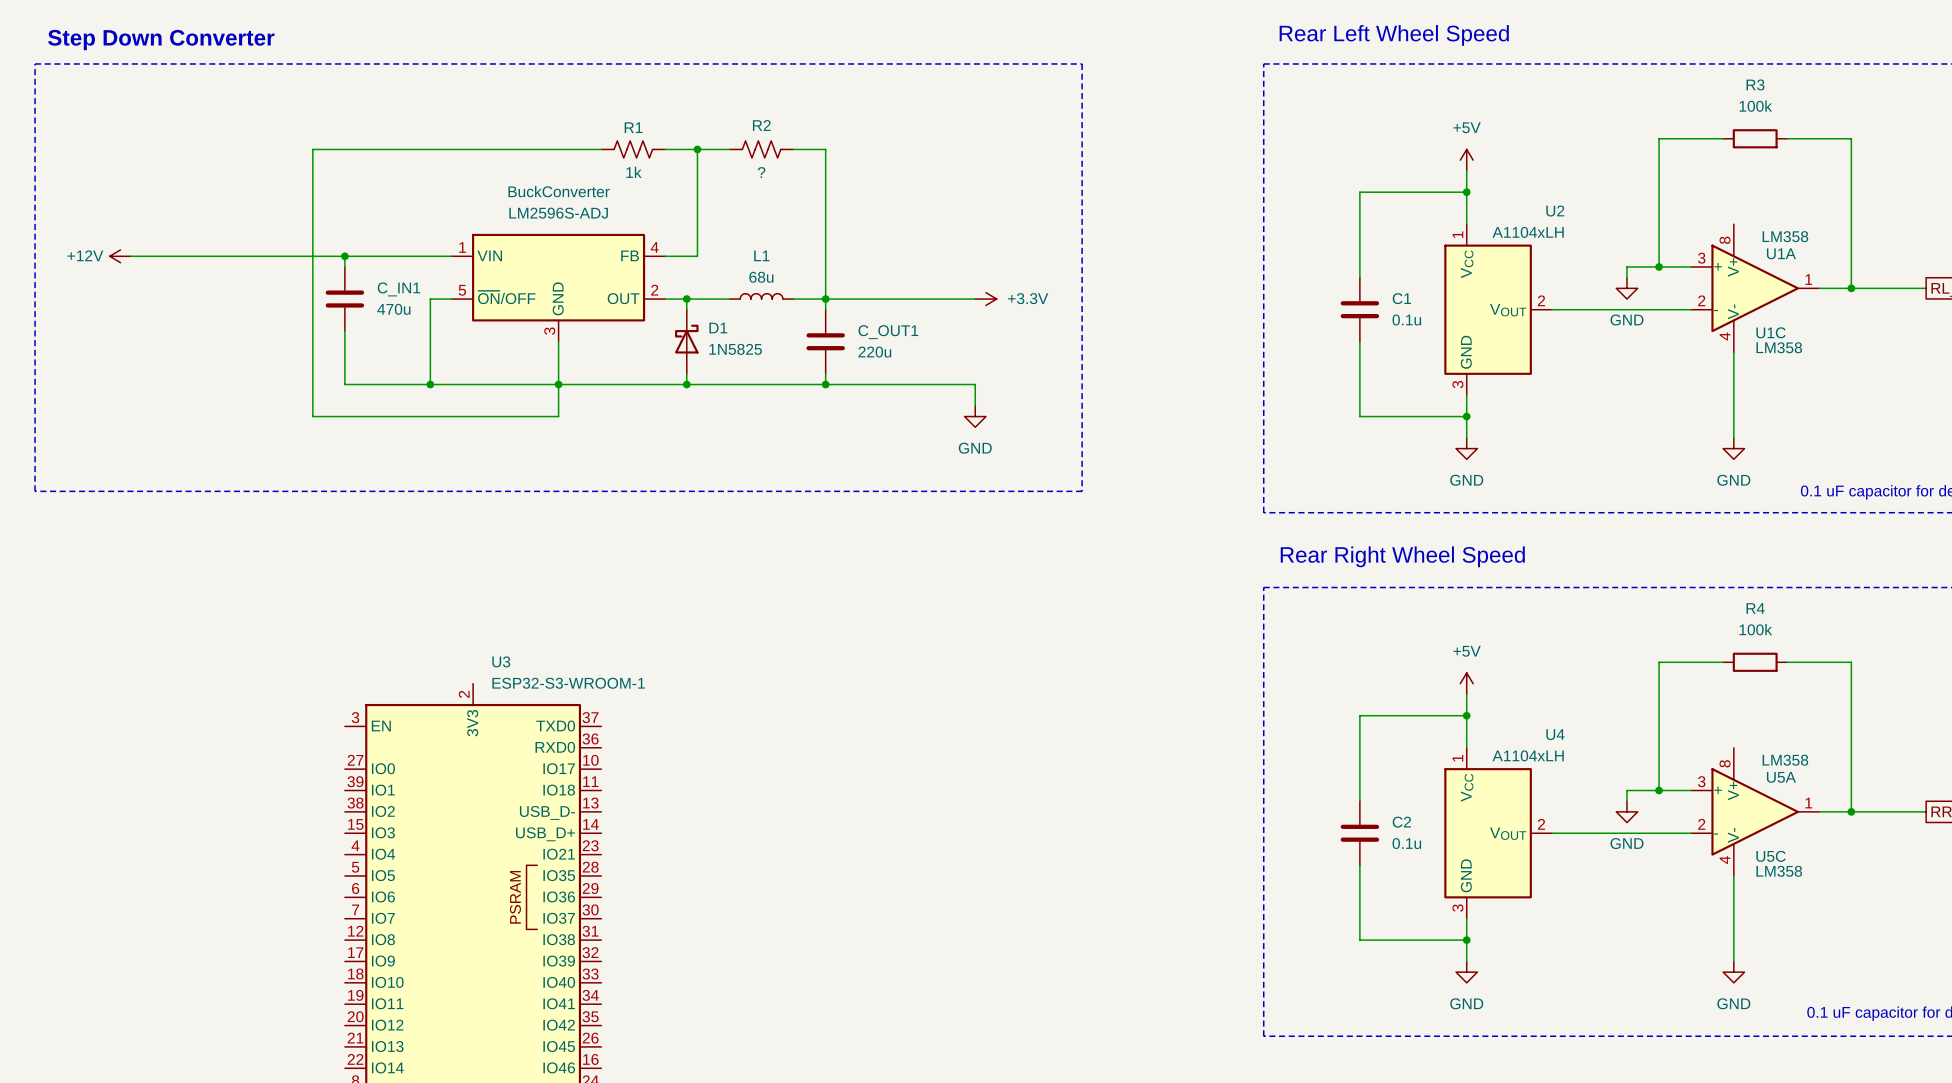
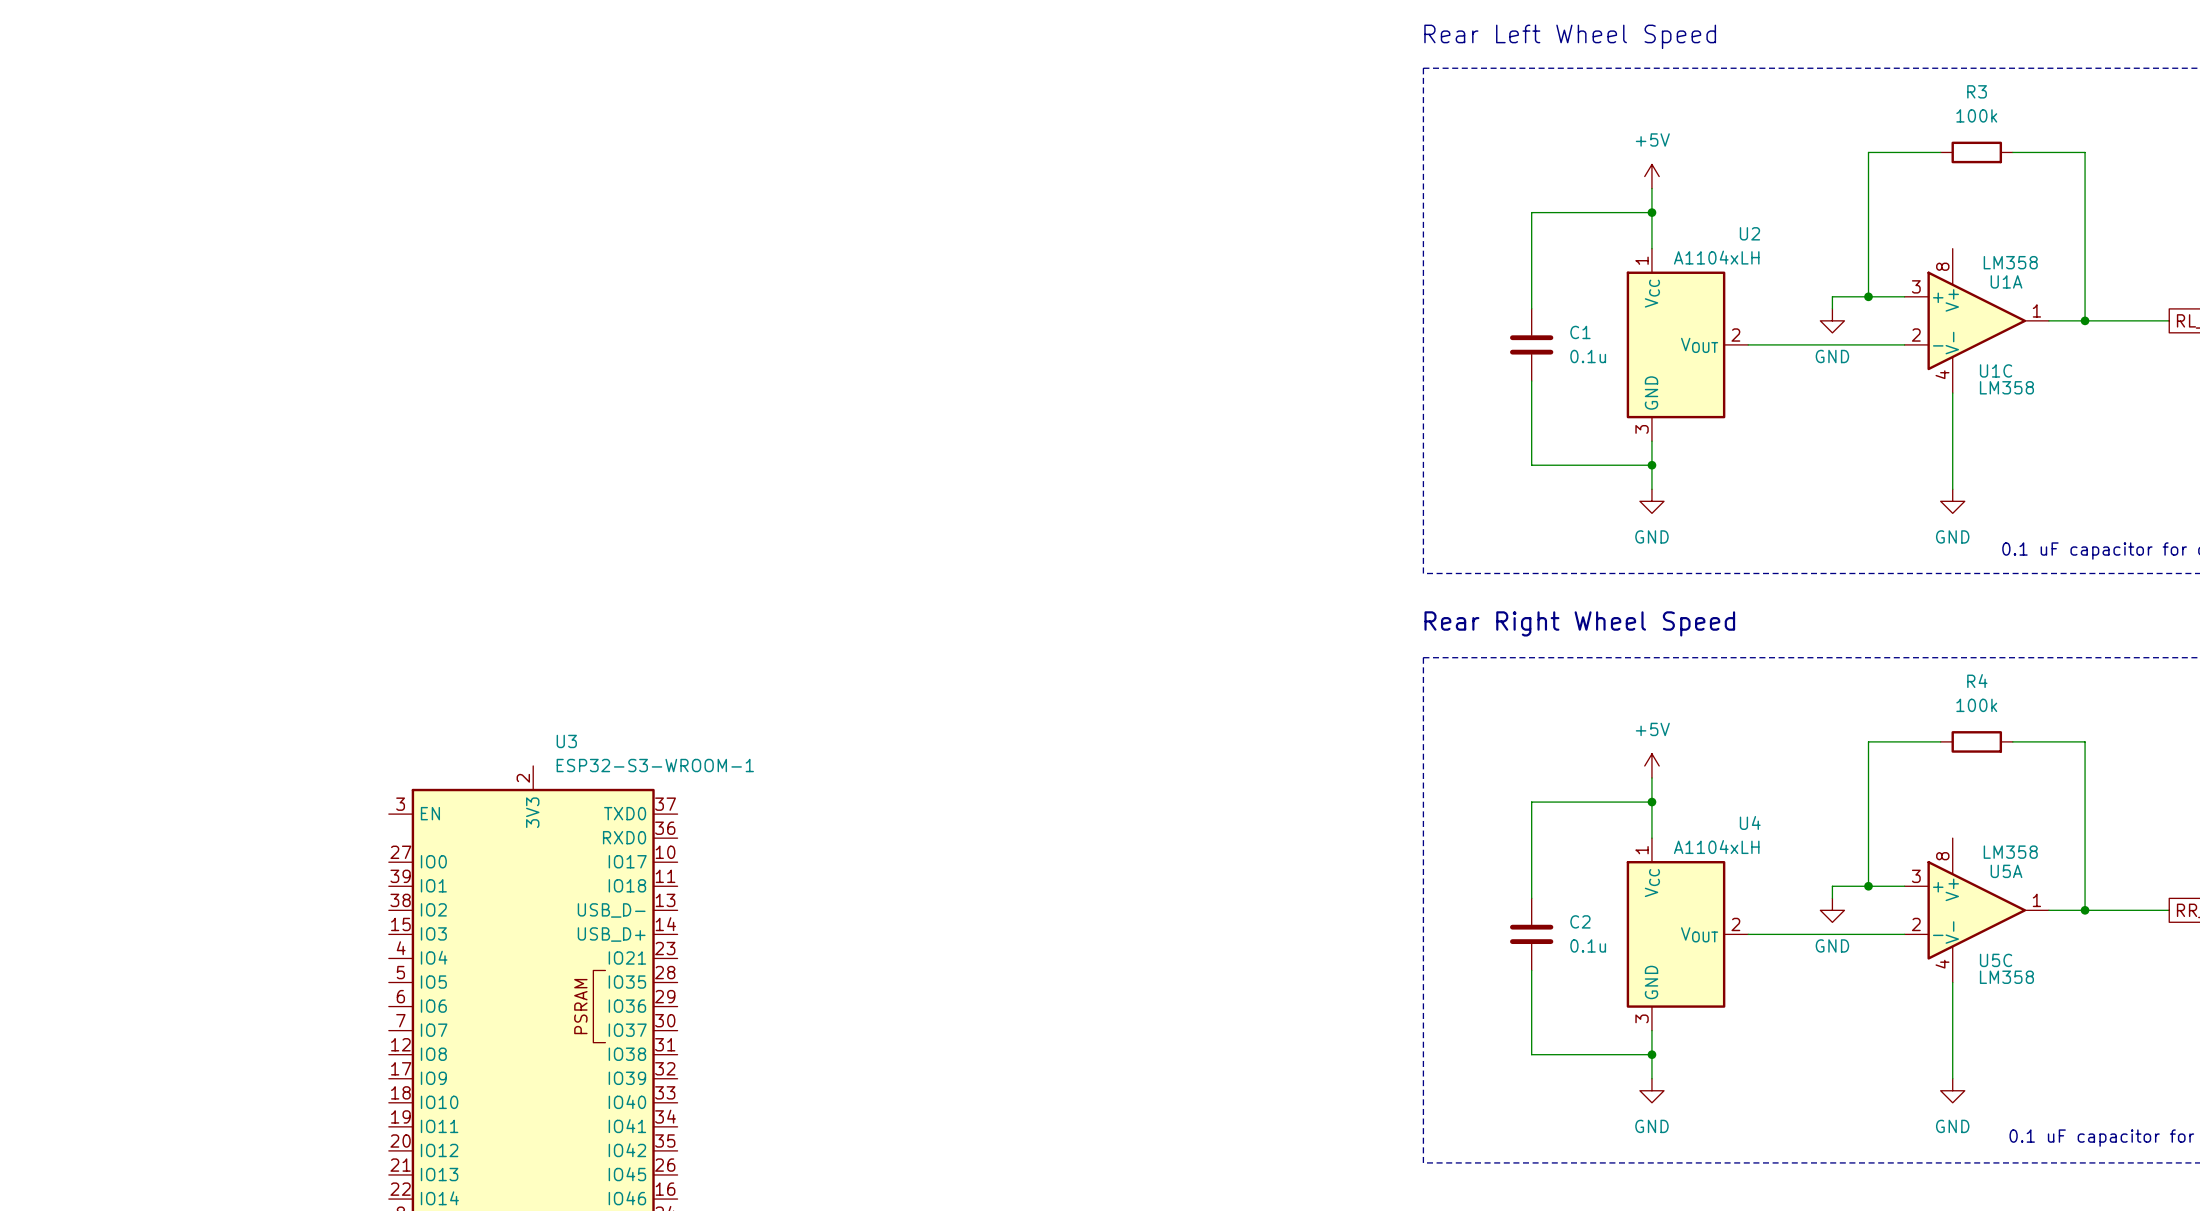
text: Step Down Converter (161, 40) -> none
line: (35, 63) (1082, 63) (1082, 491) (35, 491) (35, 63) -> none
wire: (601, 149) (312, 149) (312, 416) (558, 416) (558, 341) -> none
R1: 1k (633, 149) -> none
wire: (665, 149) (729, 149) -> none
wire: (697, 149) (697, 256) (665, 256) -> none
junction: (697, 149) -> none
R2: ? (761, 149) -> none
wire: (793, 149) (825, 149) (825, 309) -> none
power symbol: +12V (120, 256) -> none
wire: (131, 256) (451, 256) -> none
wire: (344, 256) (344, 266) -> none
junction: (344, 256) -> none
BuckConverter: LM2596S-ADJ (558, 287) -> none
L1: 68u (761, 296) -> none
C_IN1: 470u (344, 299) -> none
wire: (451, 299) (430, 299) (430, 384) -> none
wire: (665, 299) (729, 299) -> none
wire: (686, 299) (686, 309) -> none
junction: (686, 299) -> none
wire: (793, 299) (975, 299) -> none
junction: (825, 299) -> none
power symbol: +3.3V (985, 299) -> none
wire: (344, 331) (344, 384) (975, 384) (975, 405) -> none
D1: 1N5825 (686, 341) -> none
C_OUT1: 220u (825, 341) -> none
wire: (686, 373) (686, 384) -> none
wire: (825, 373) (825, 384) -> none
junction: (430, 384) -> none
junction: (558, 384) -> none
junction: (686, 384) -> none
junction: (825, 384) -> none
power symbol: GND (975, 416) -> none

